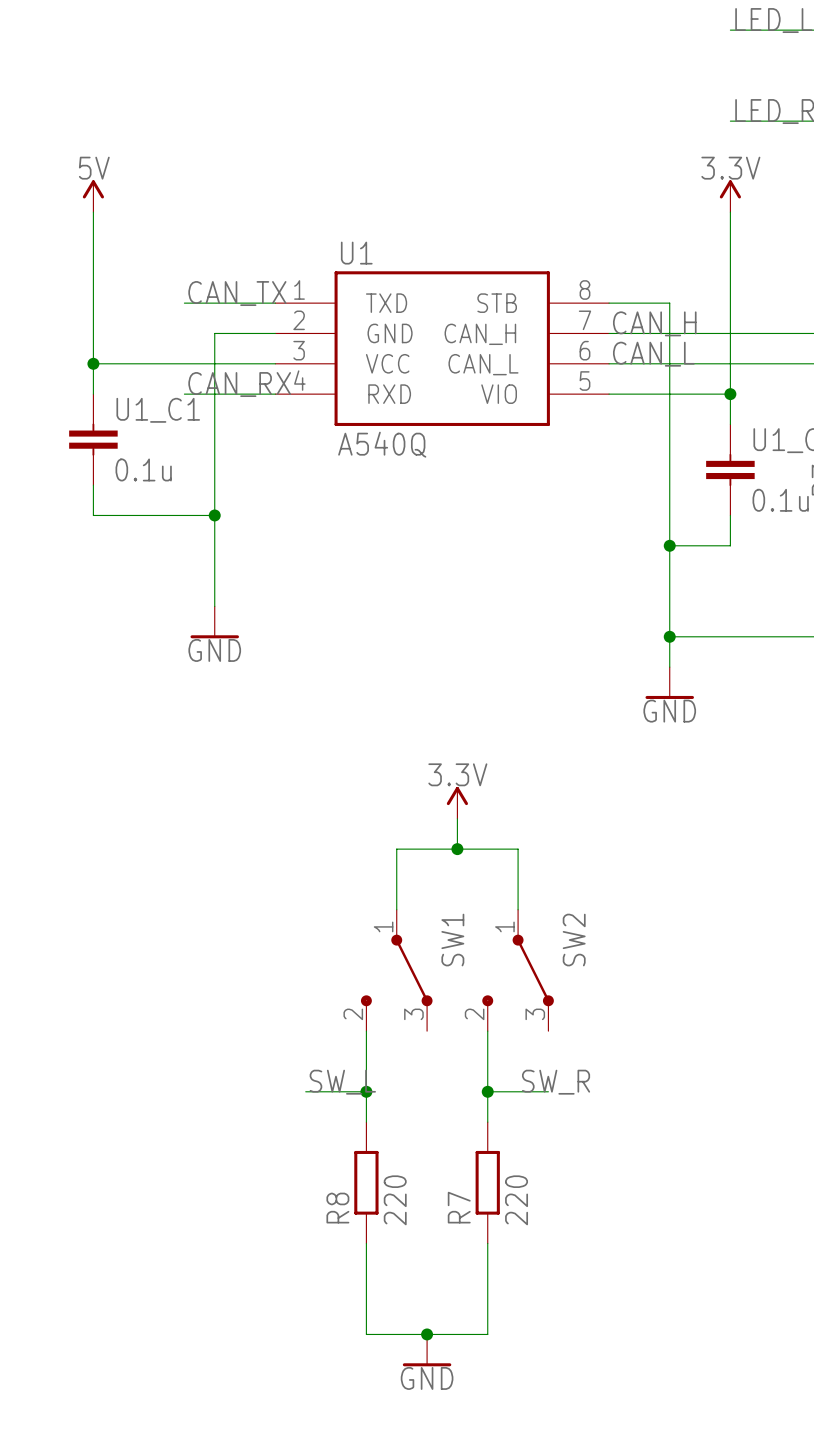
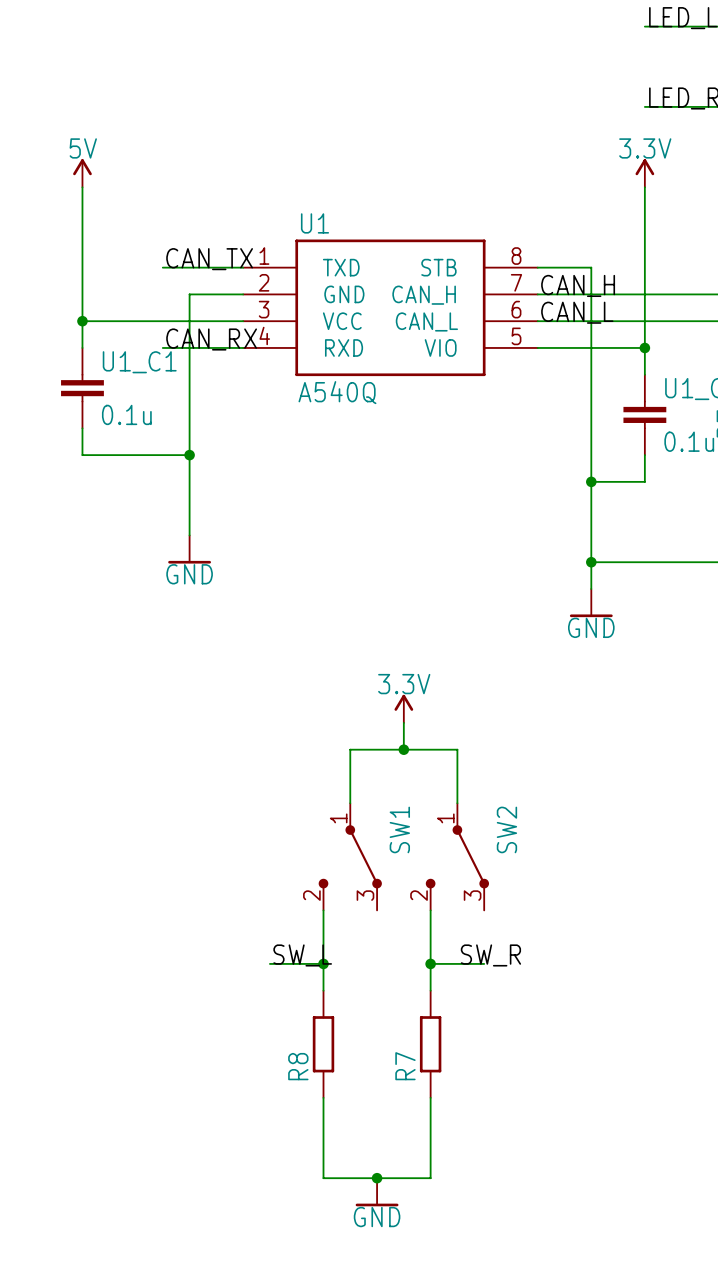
R8 value: 220 (395, 1200) -> none
R7 value: 220 (516, 1200) -> none

